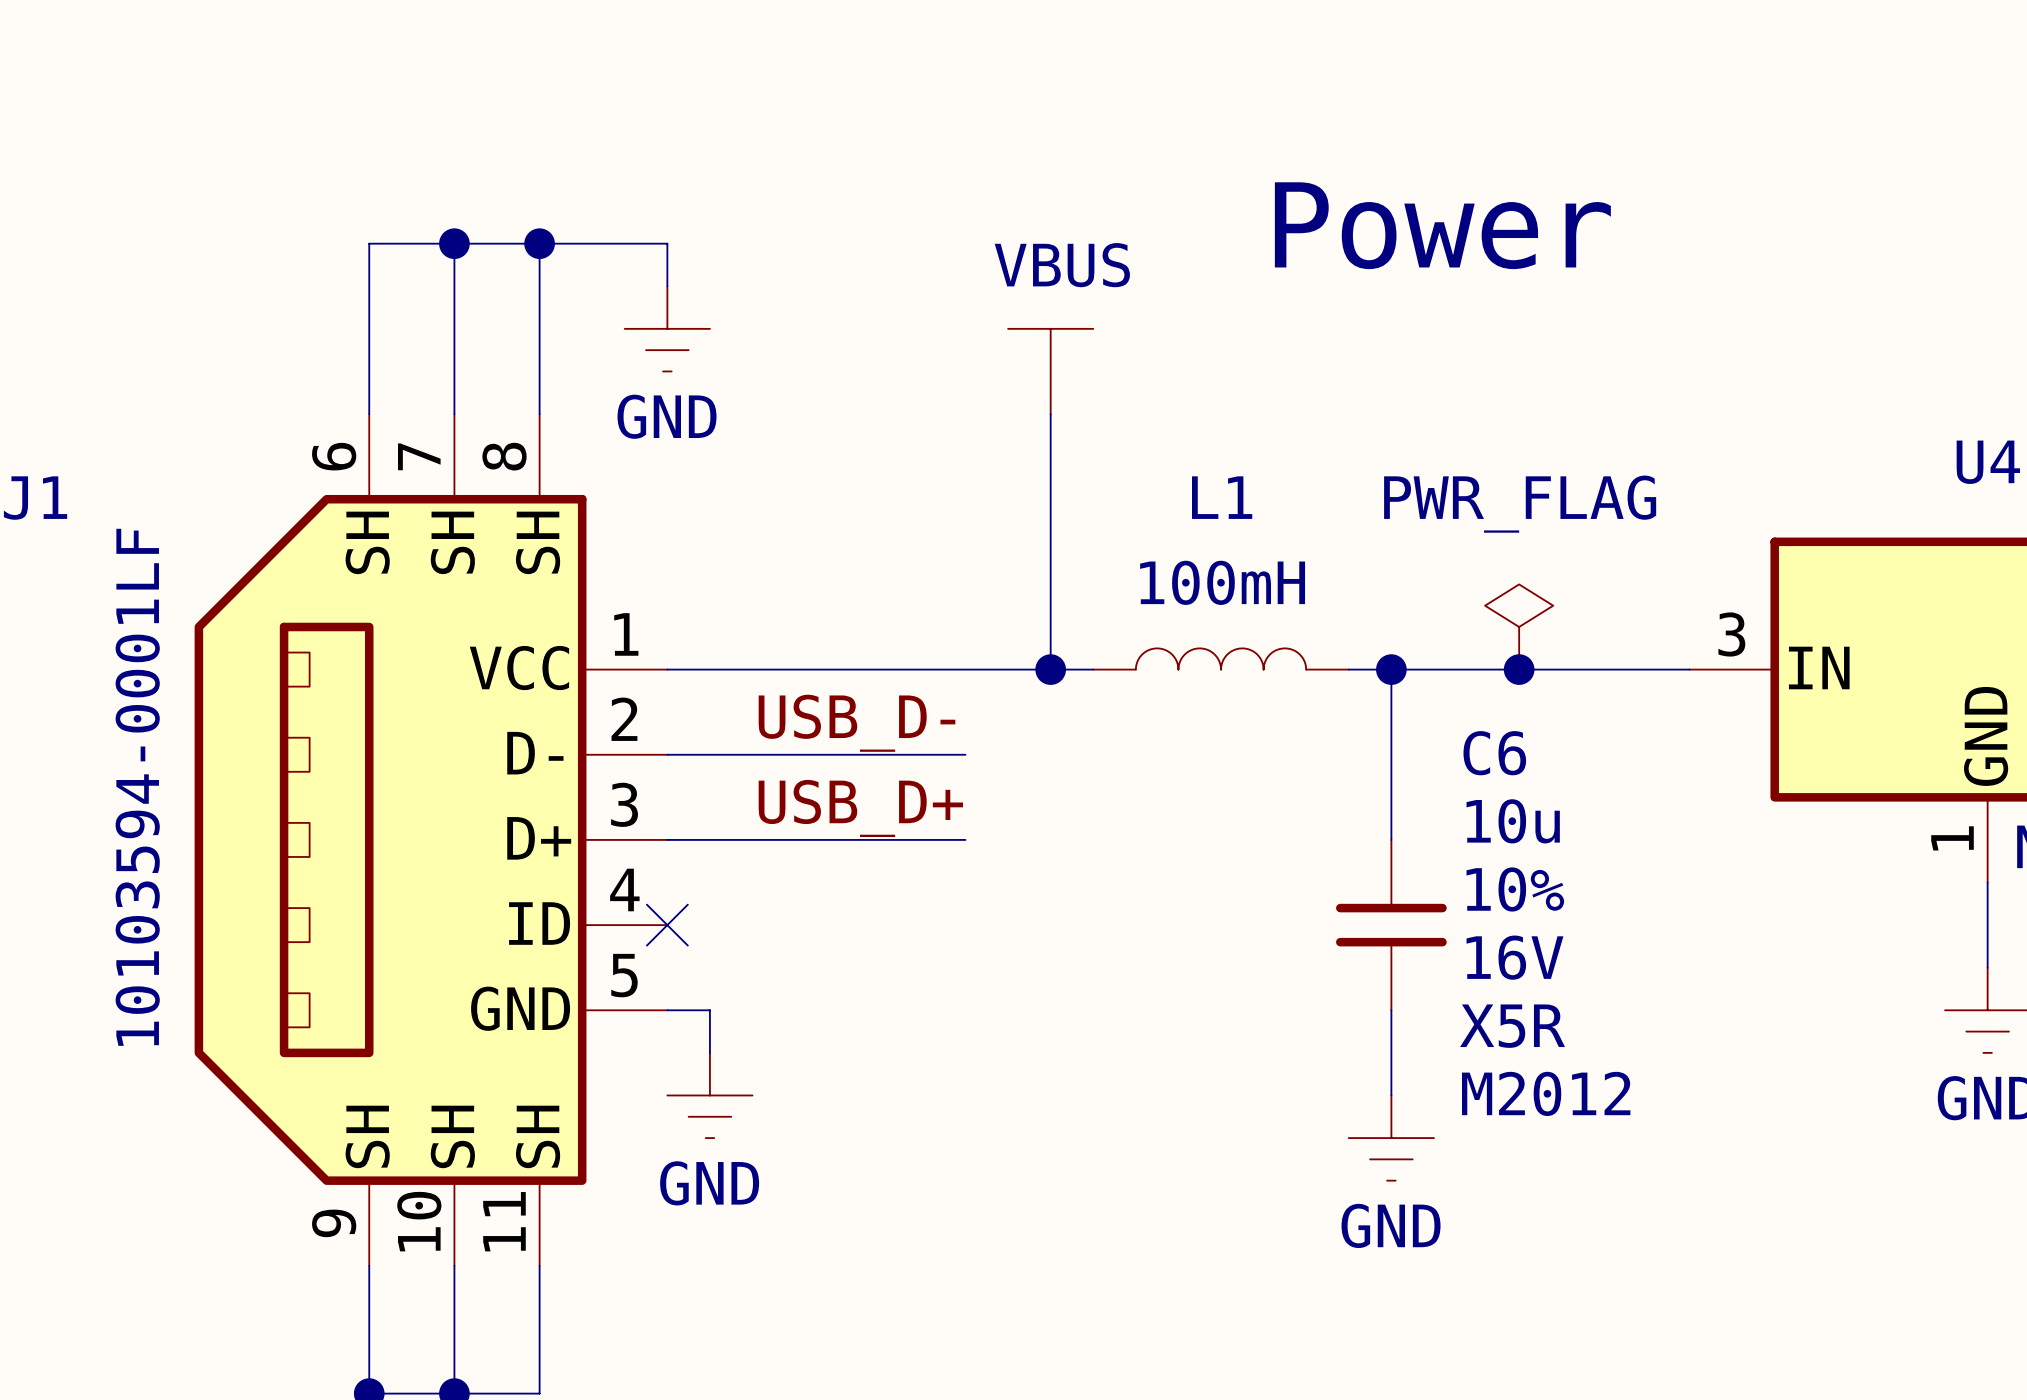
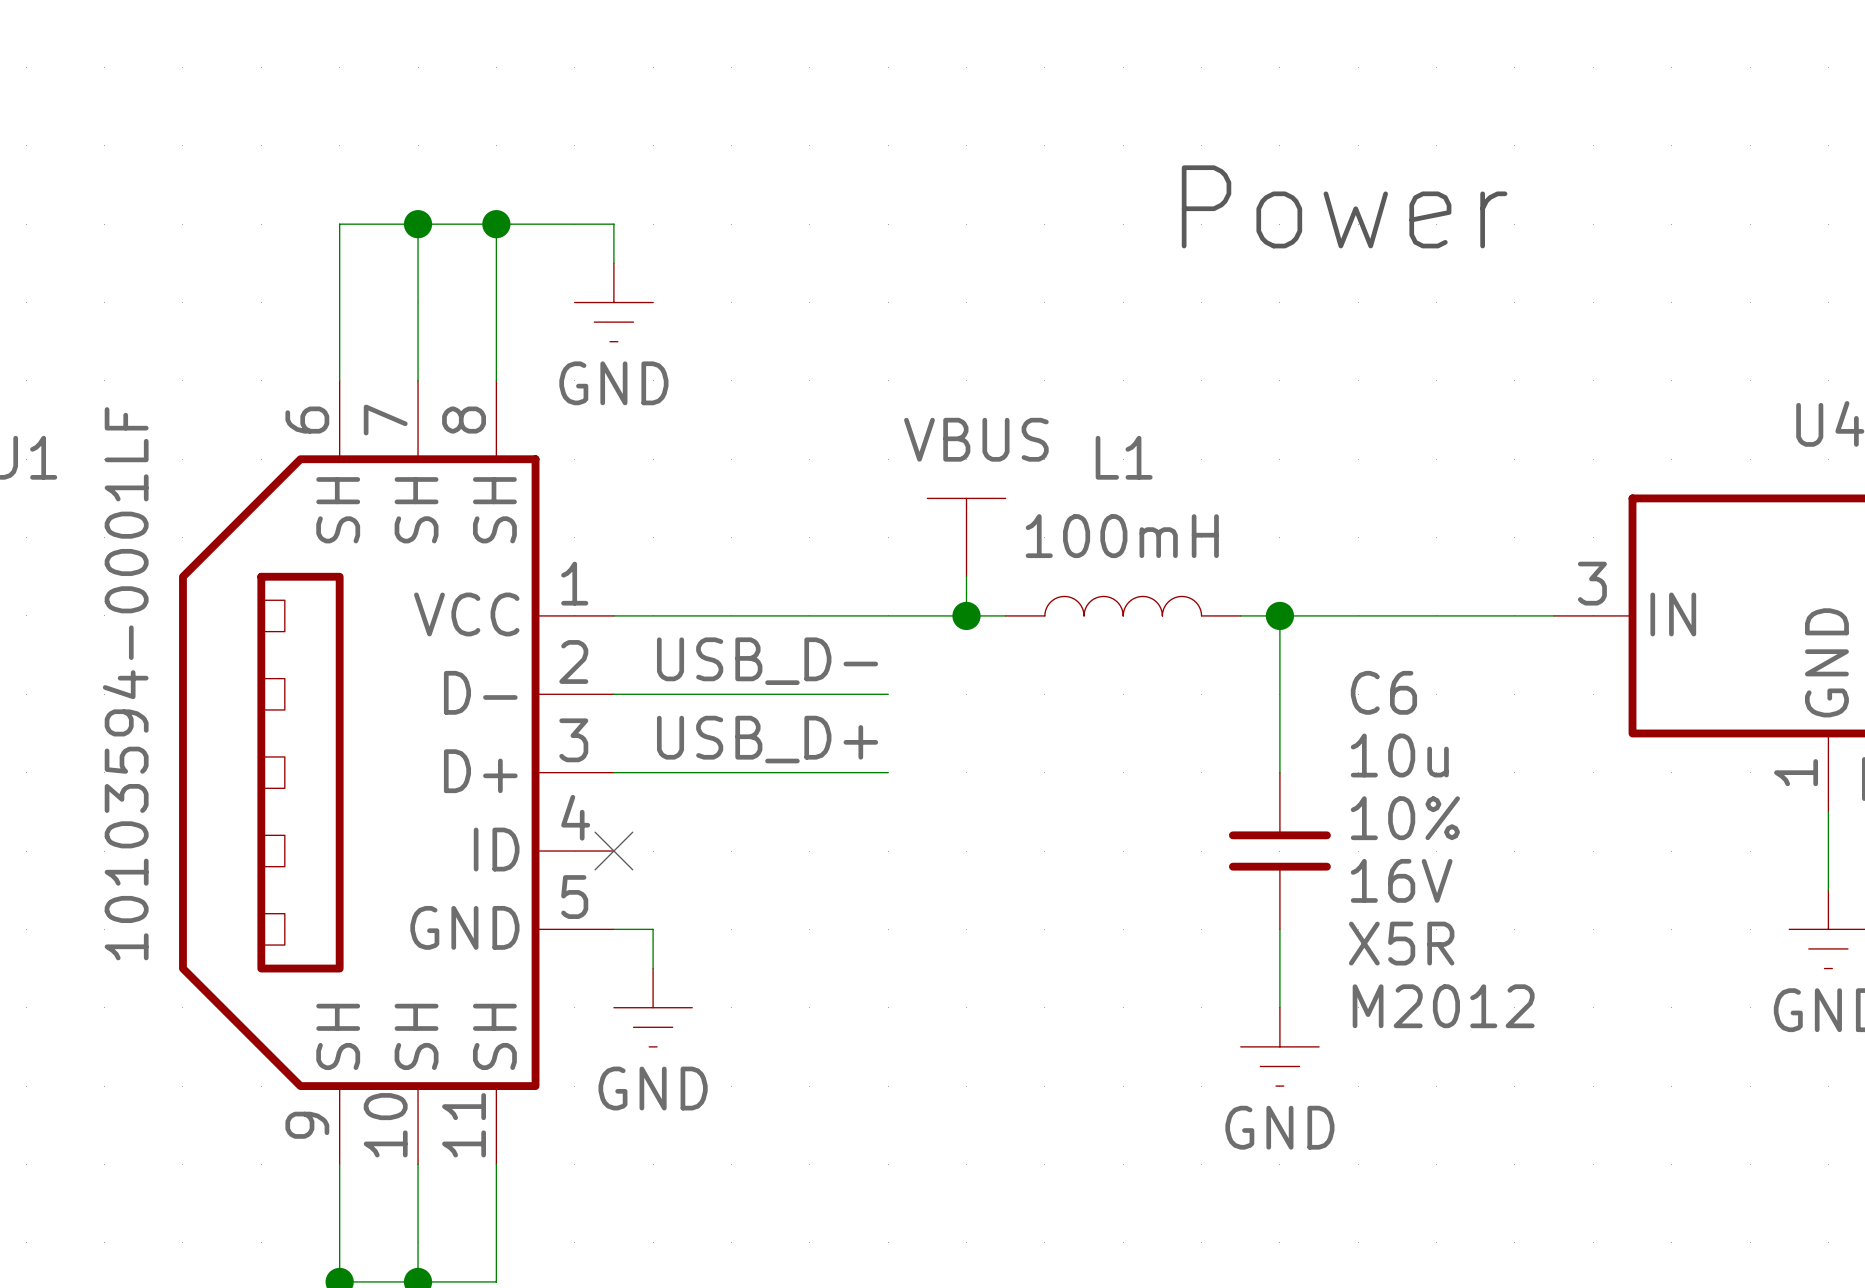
power symbol position: VBUS (1050, 371) -> VBUS (966, 537)
wire: (1050, 414) (1050, 626) -> none
power symbol: PWR_FLAG (1519, 626) -> none
junction: (1519, 669) -> none

